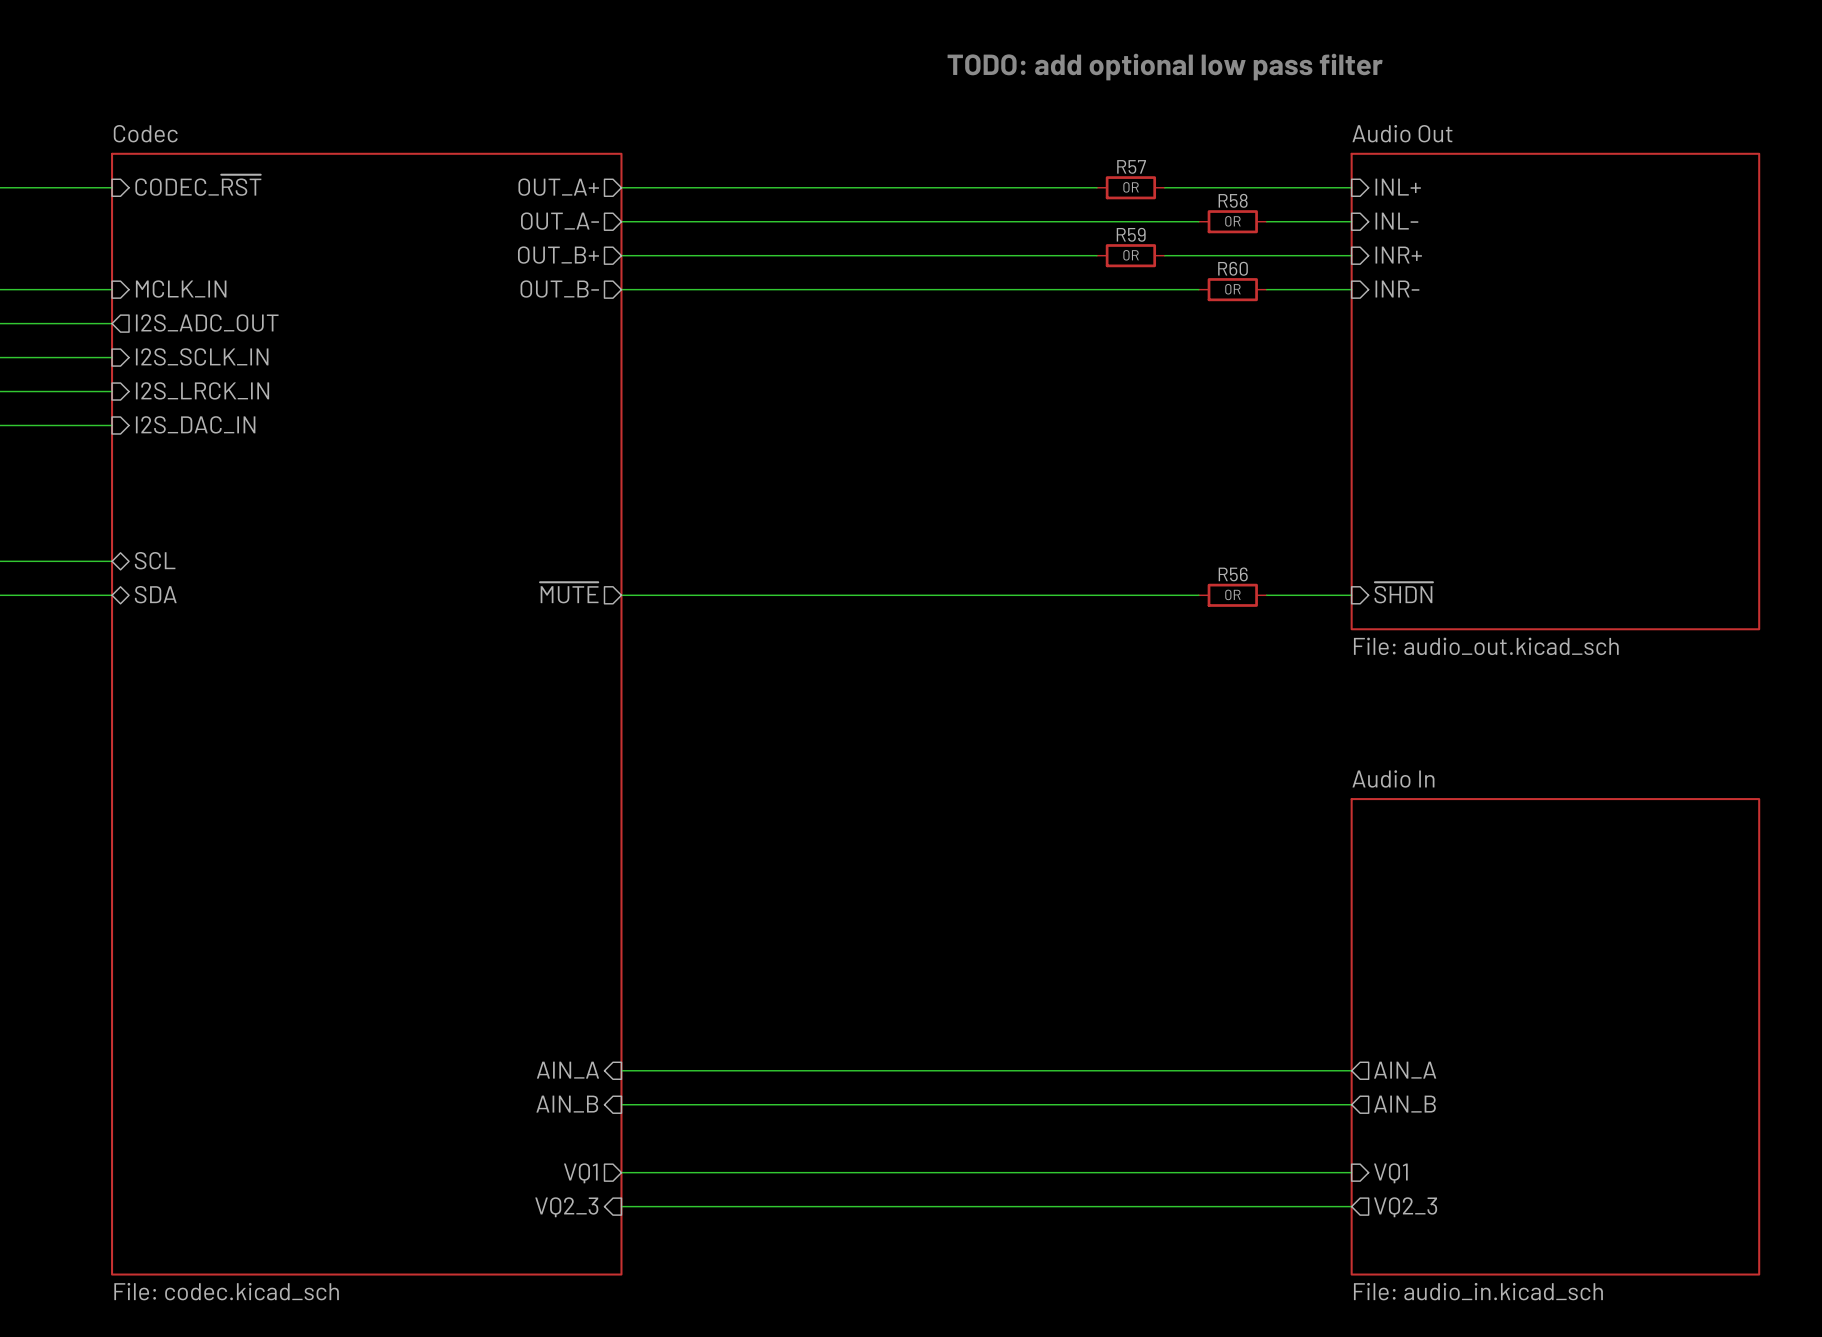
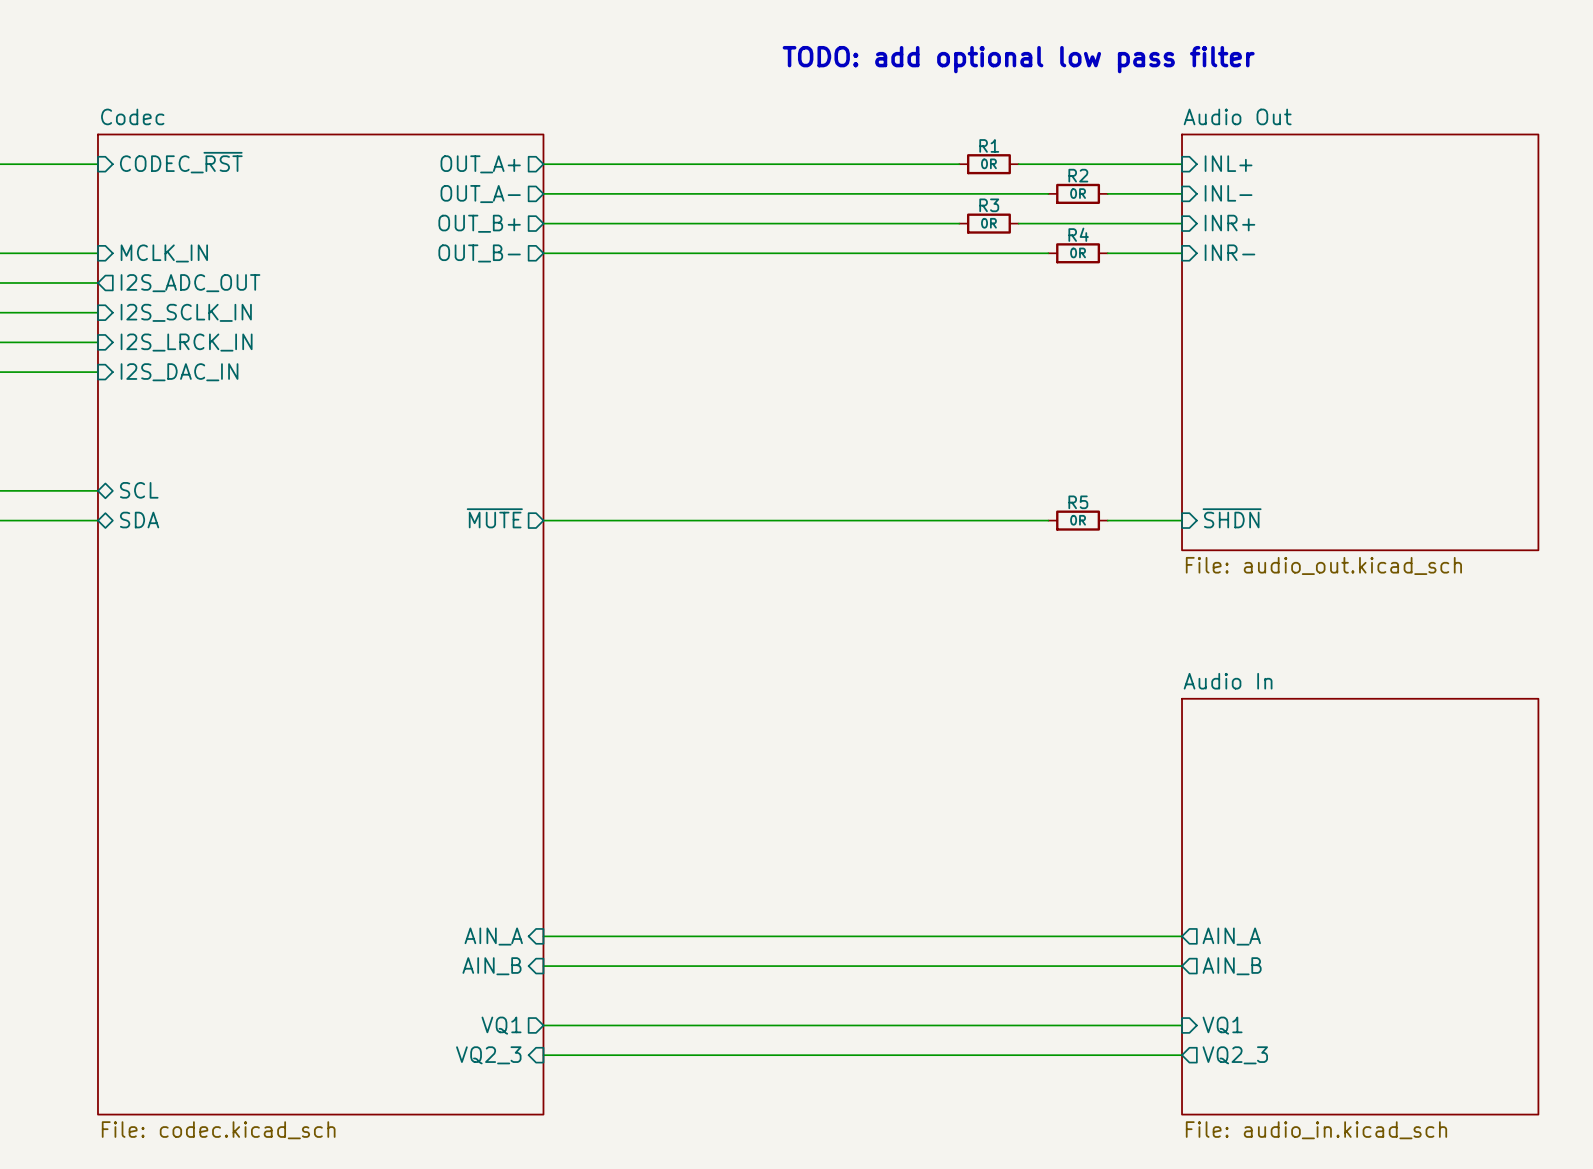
R57 name: R57 (1131, 166) -> R1 (989, 145)
R58 name: R58 (1233, 200) -> R2 (1078, 175)
R59 name: R59 (1131, 234) -> R3 (989, 205)
R60 name: R60 (1233, 268) -> R4 (1078, 234)
R56 name: R56 (1233, 574) -> R5 (1078, 502)

